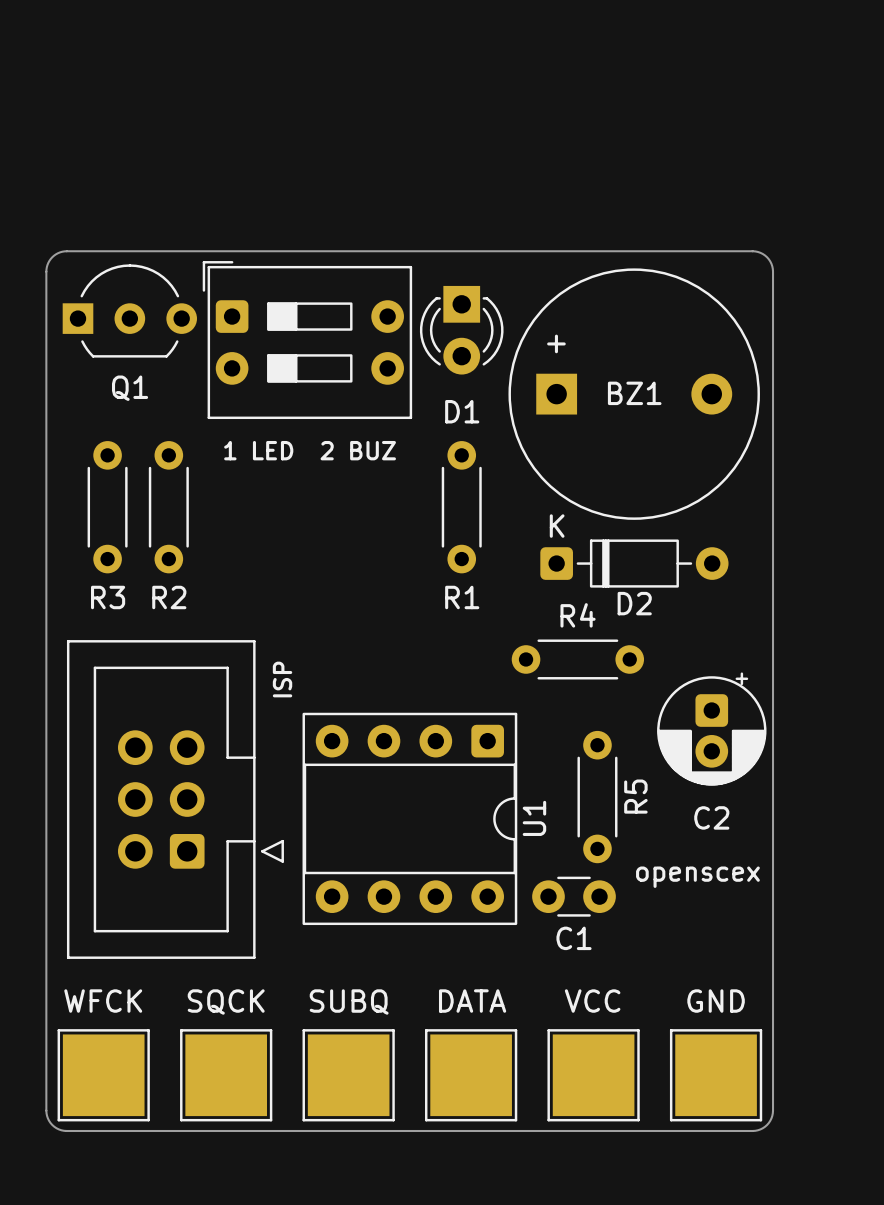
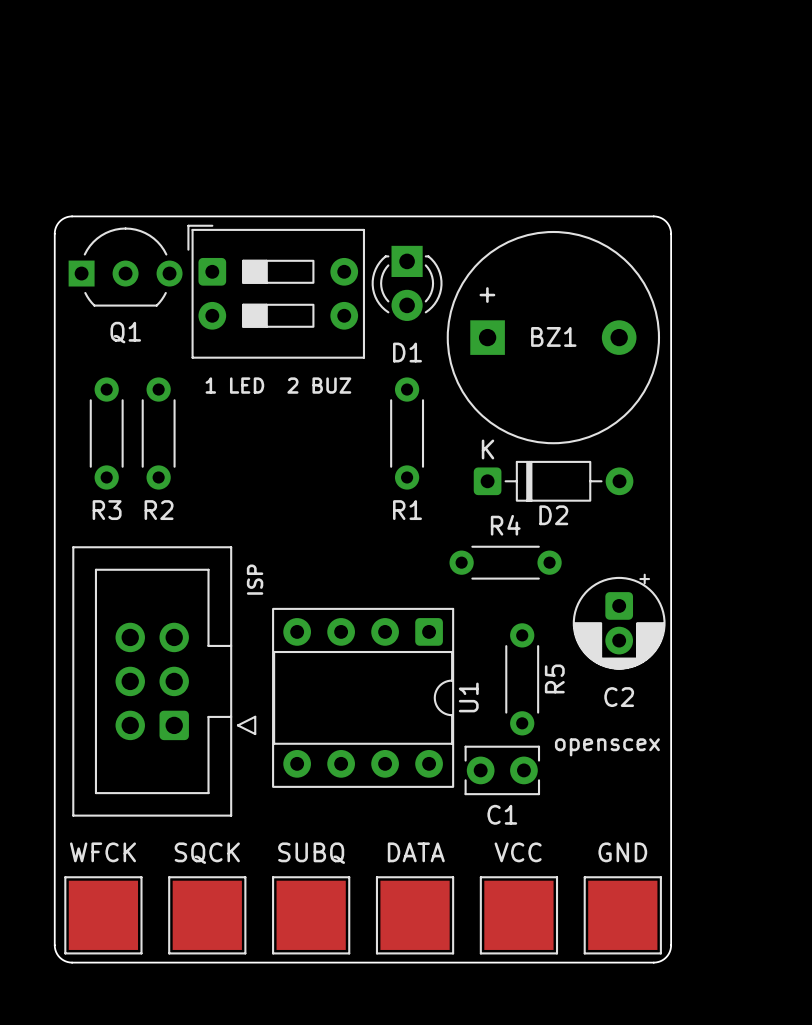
C1 footprint: [532, 876, 616, 917] -> [464, 745, 541, 796]

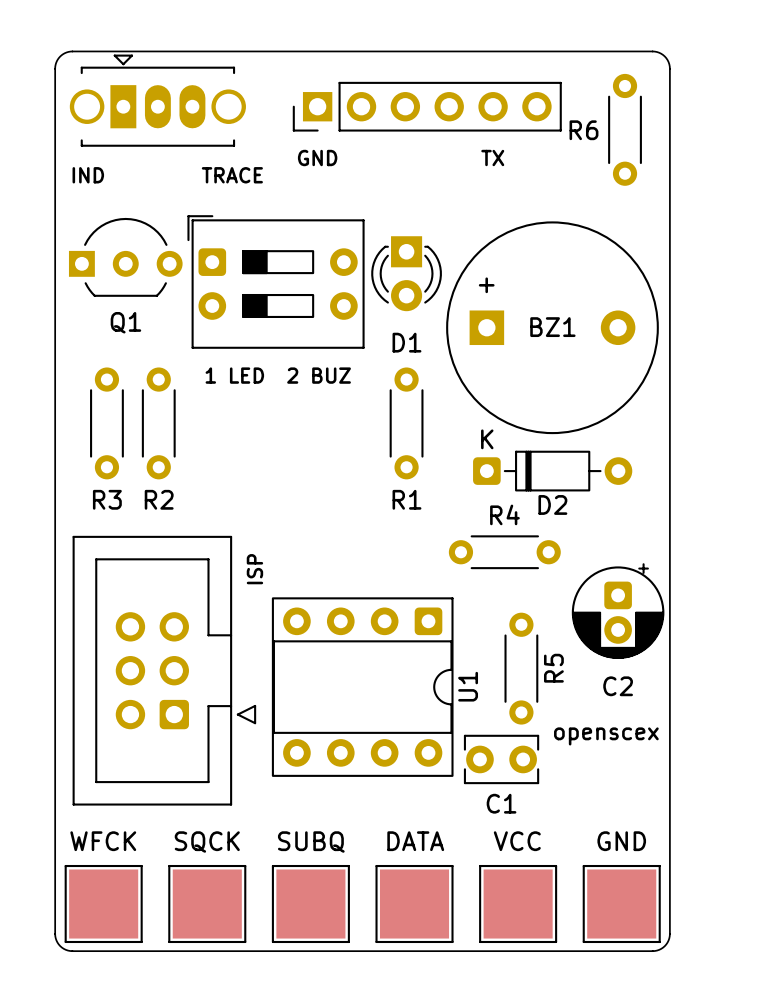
part: none -> (157, 100)
part: none -> (427, 106)
R6: none -> (625, 129)
text: none -> GND (317, 158)
text: none -> TX (492, 158)
text: none -> IND (88, 175)
text: none -> TRACE (232, 175)
board edge: (54, 233) (59, 221) (72, 216) (653, 216) (666, 221) (671, 233) -> (55, 224) (55, 66) (61, 55) (72, 51) (657, 52) (664, 56) (669, 66) (669, 224)

